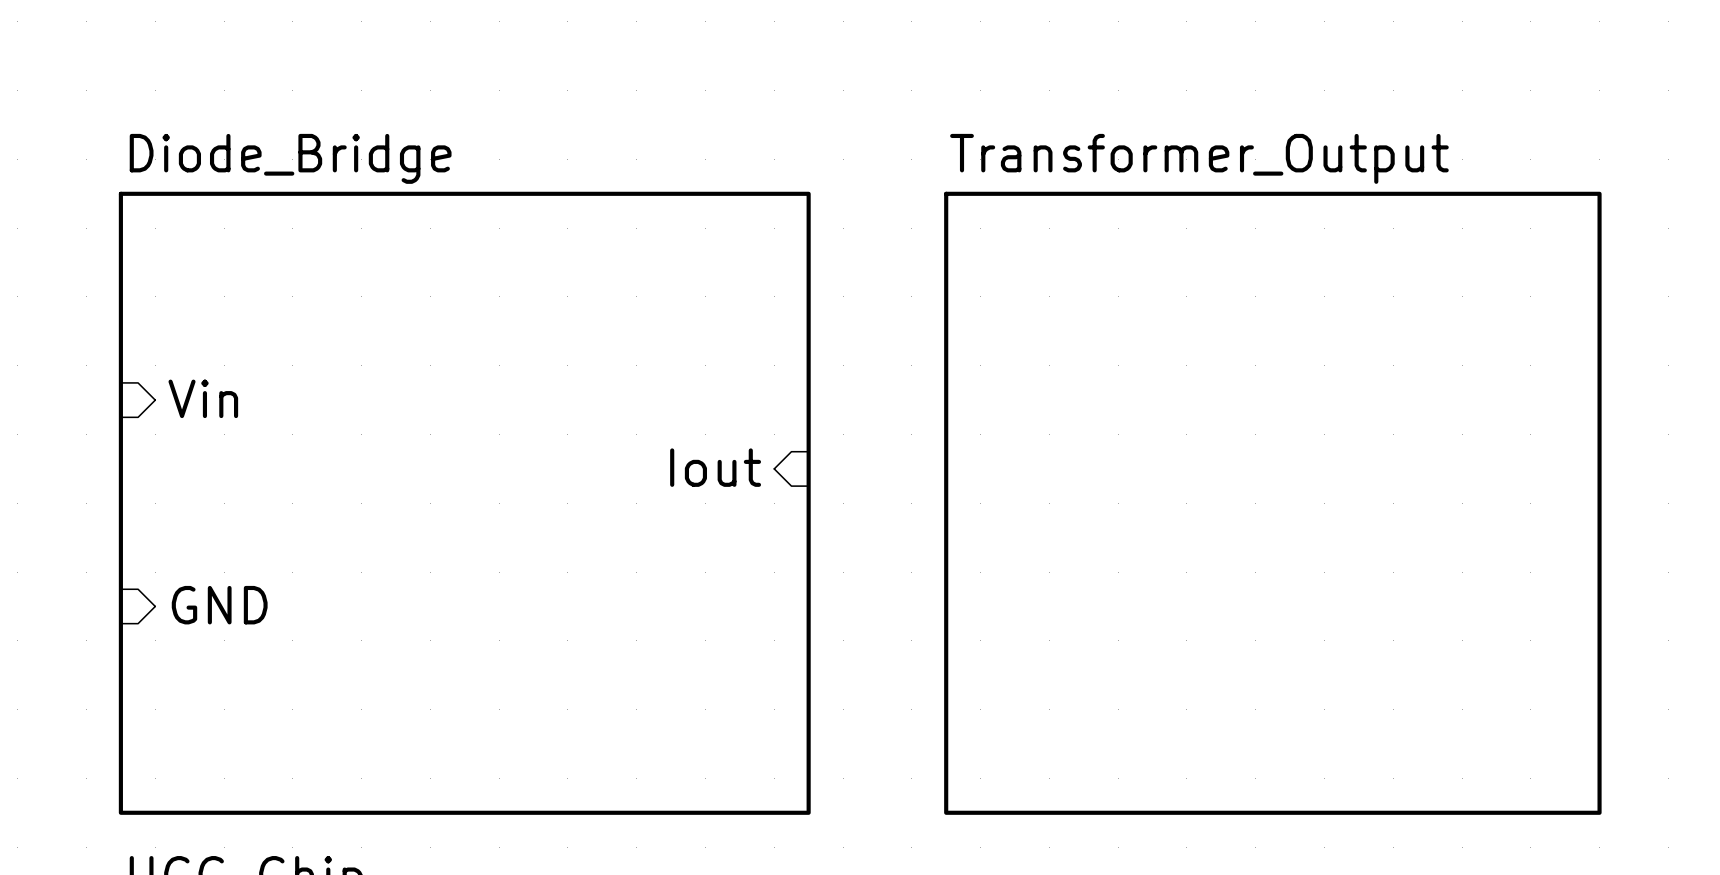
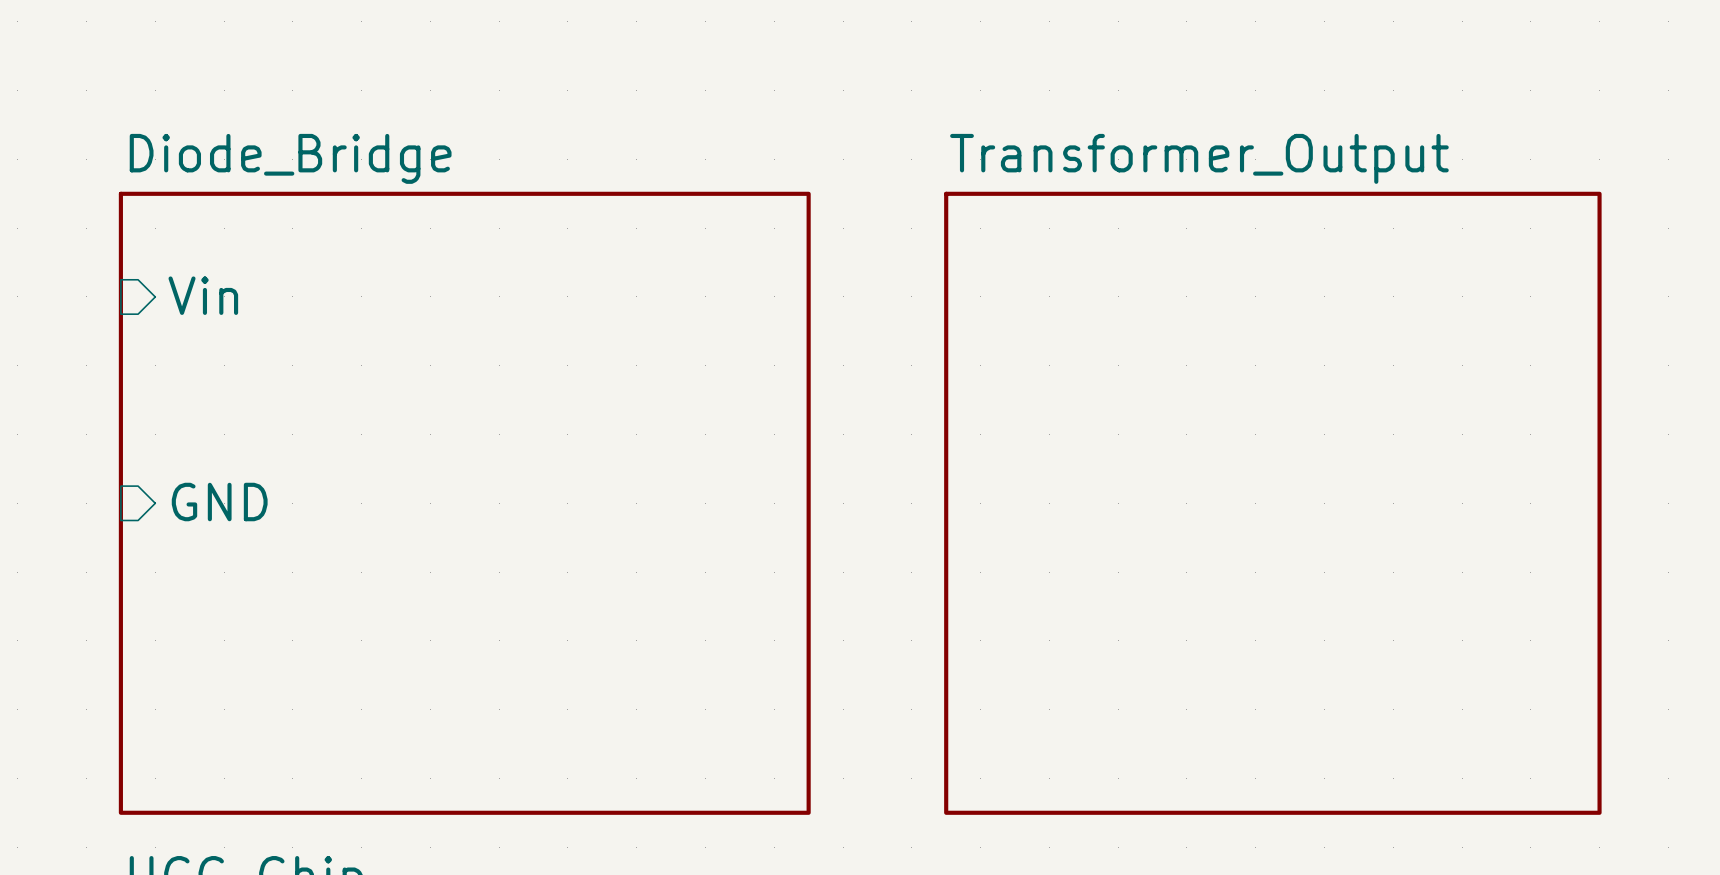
sheet pin position: Vin (203, 398) -> Vin (203, 295)
sheet pin: Iout (715, 467) -> none
sheet pin position: GND (219, 605) -> GND (219, 502)

